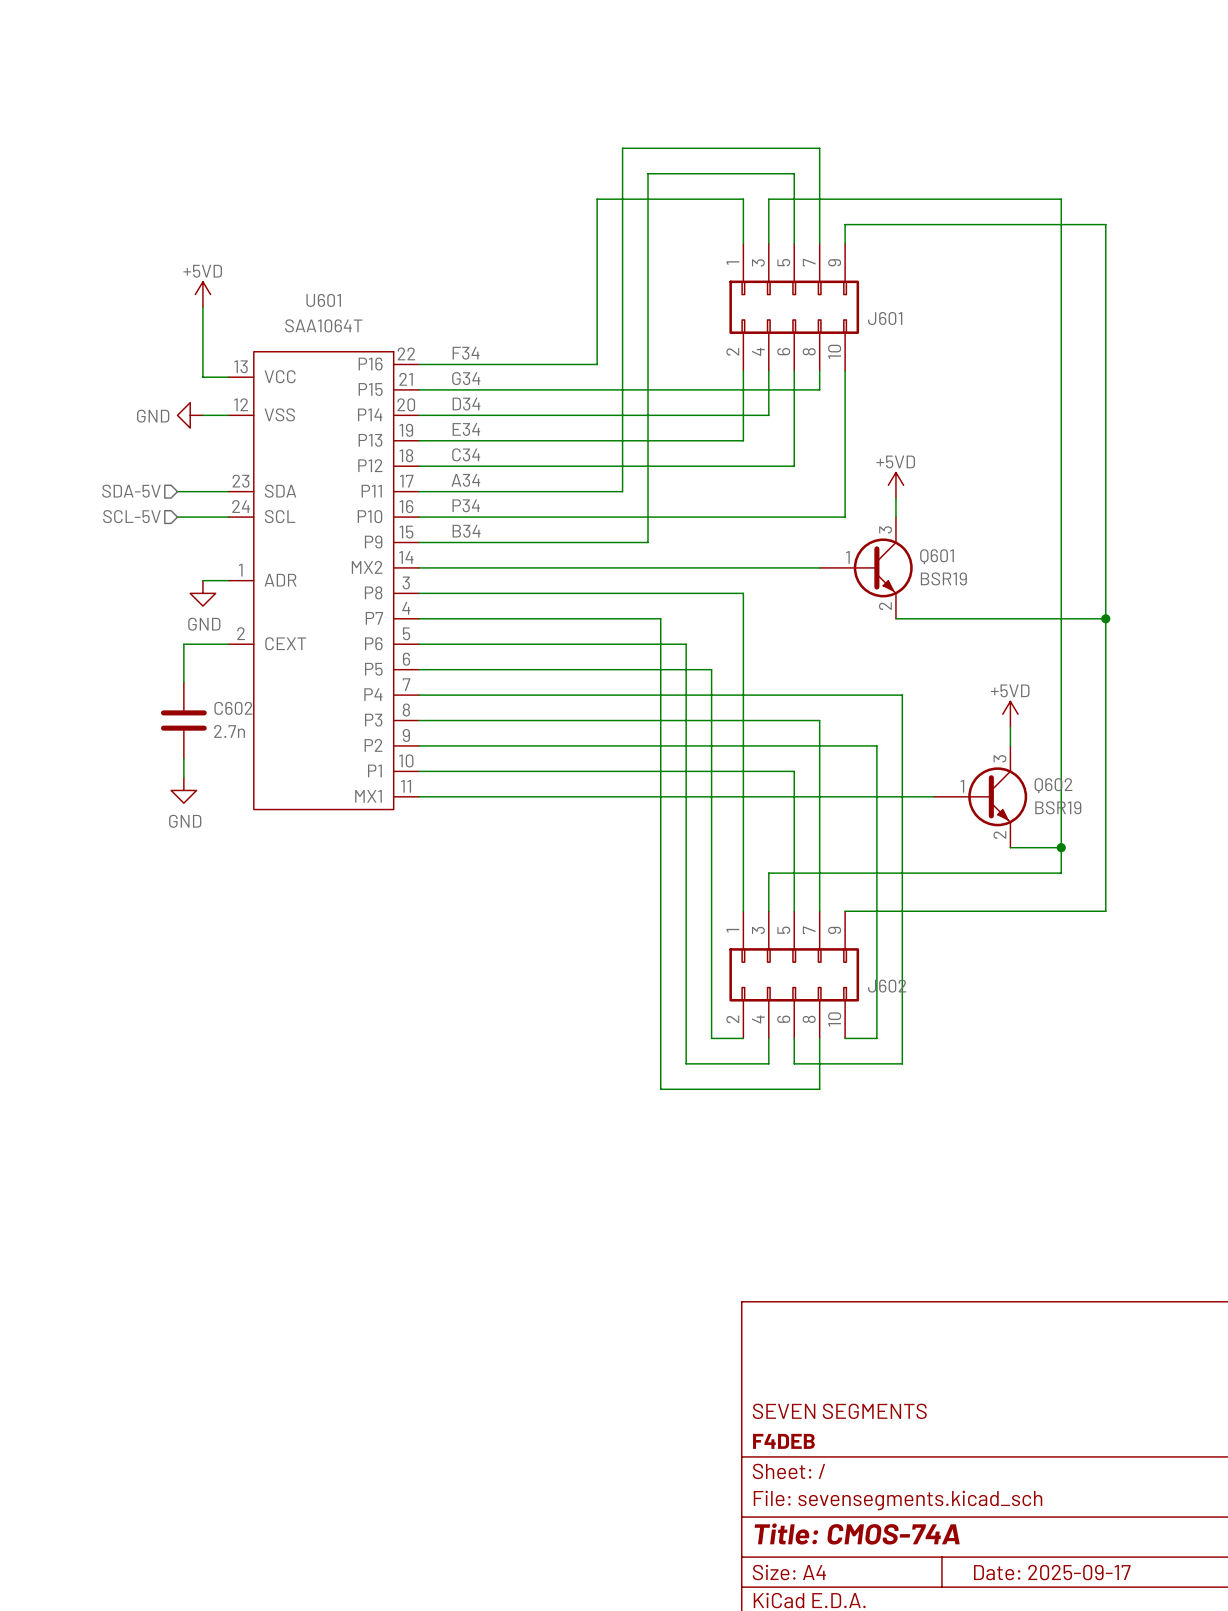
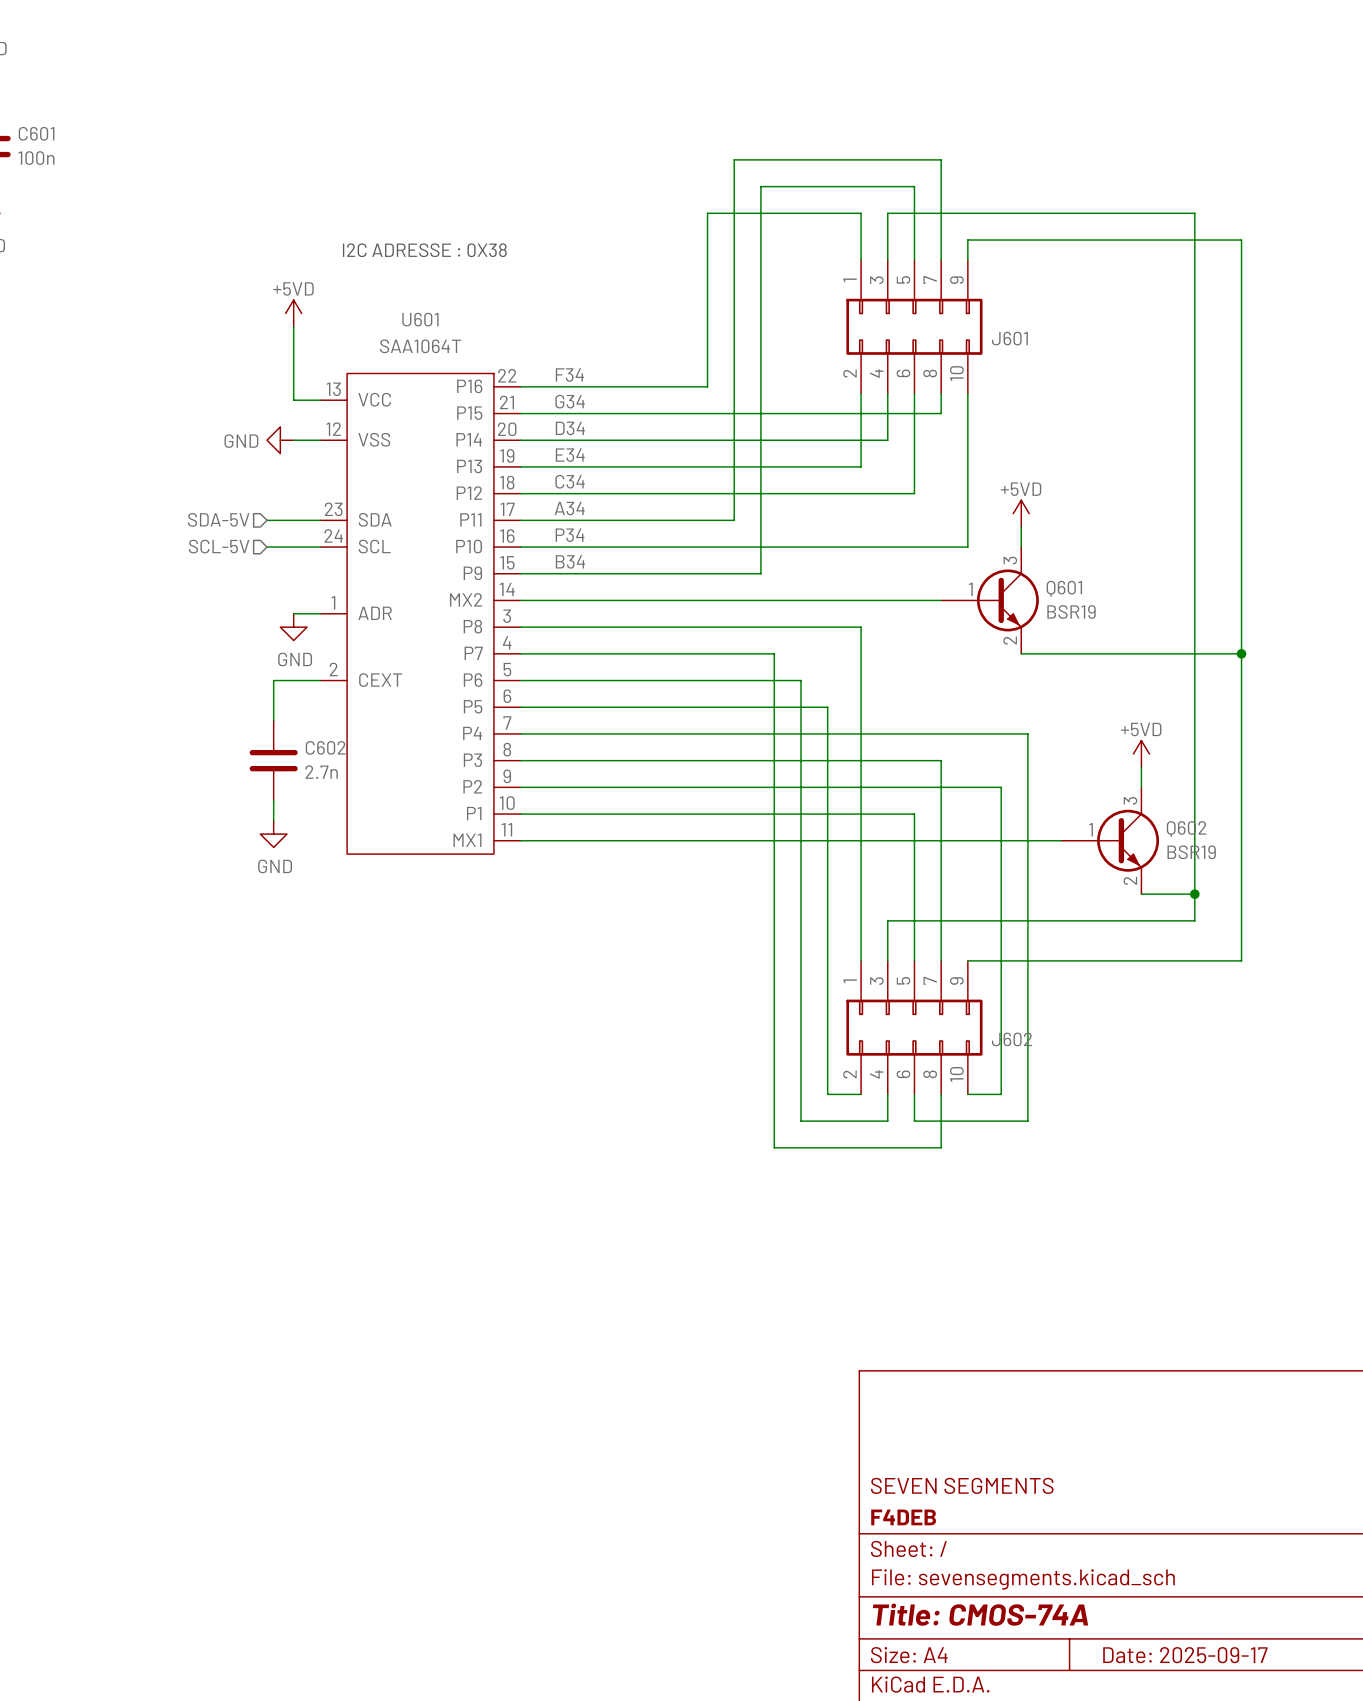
text: none -> I2C ADRESSE : 0X38 (424, 250)

